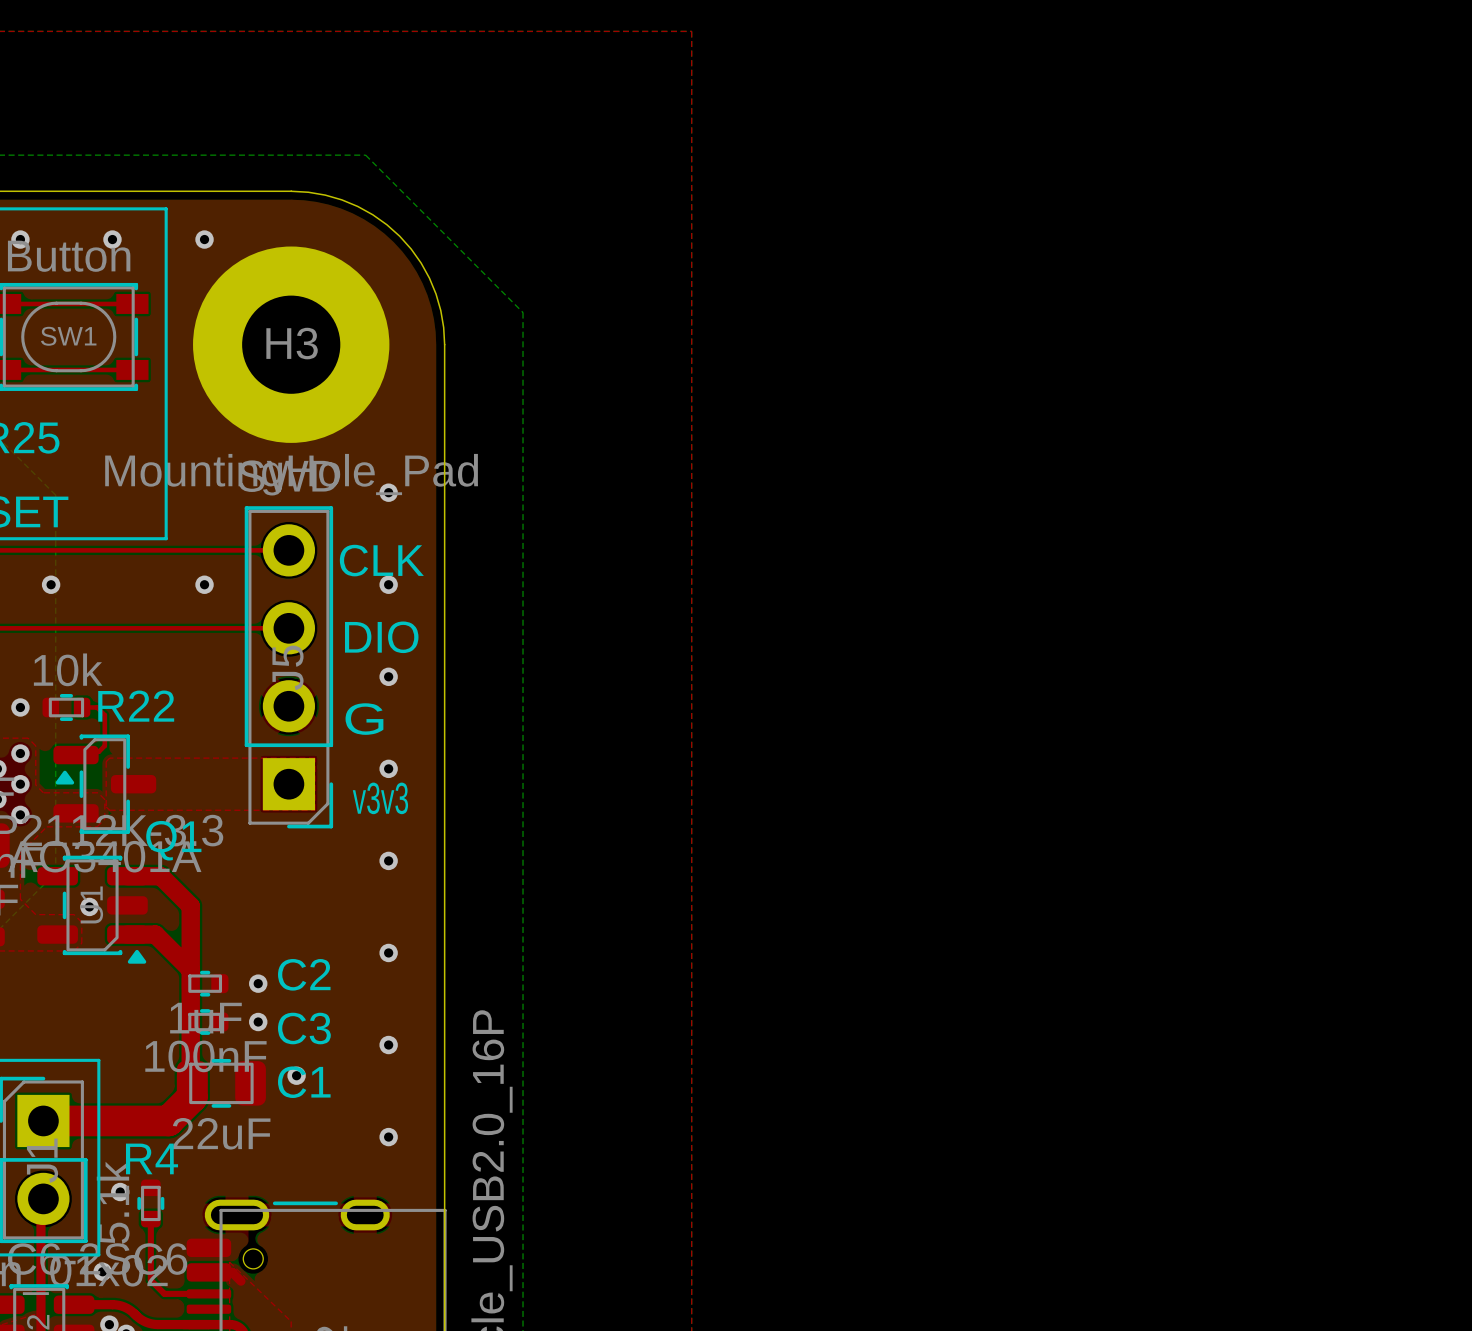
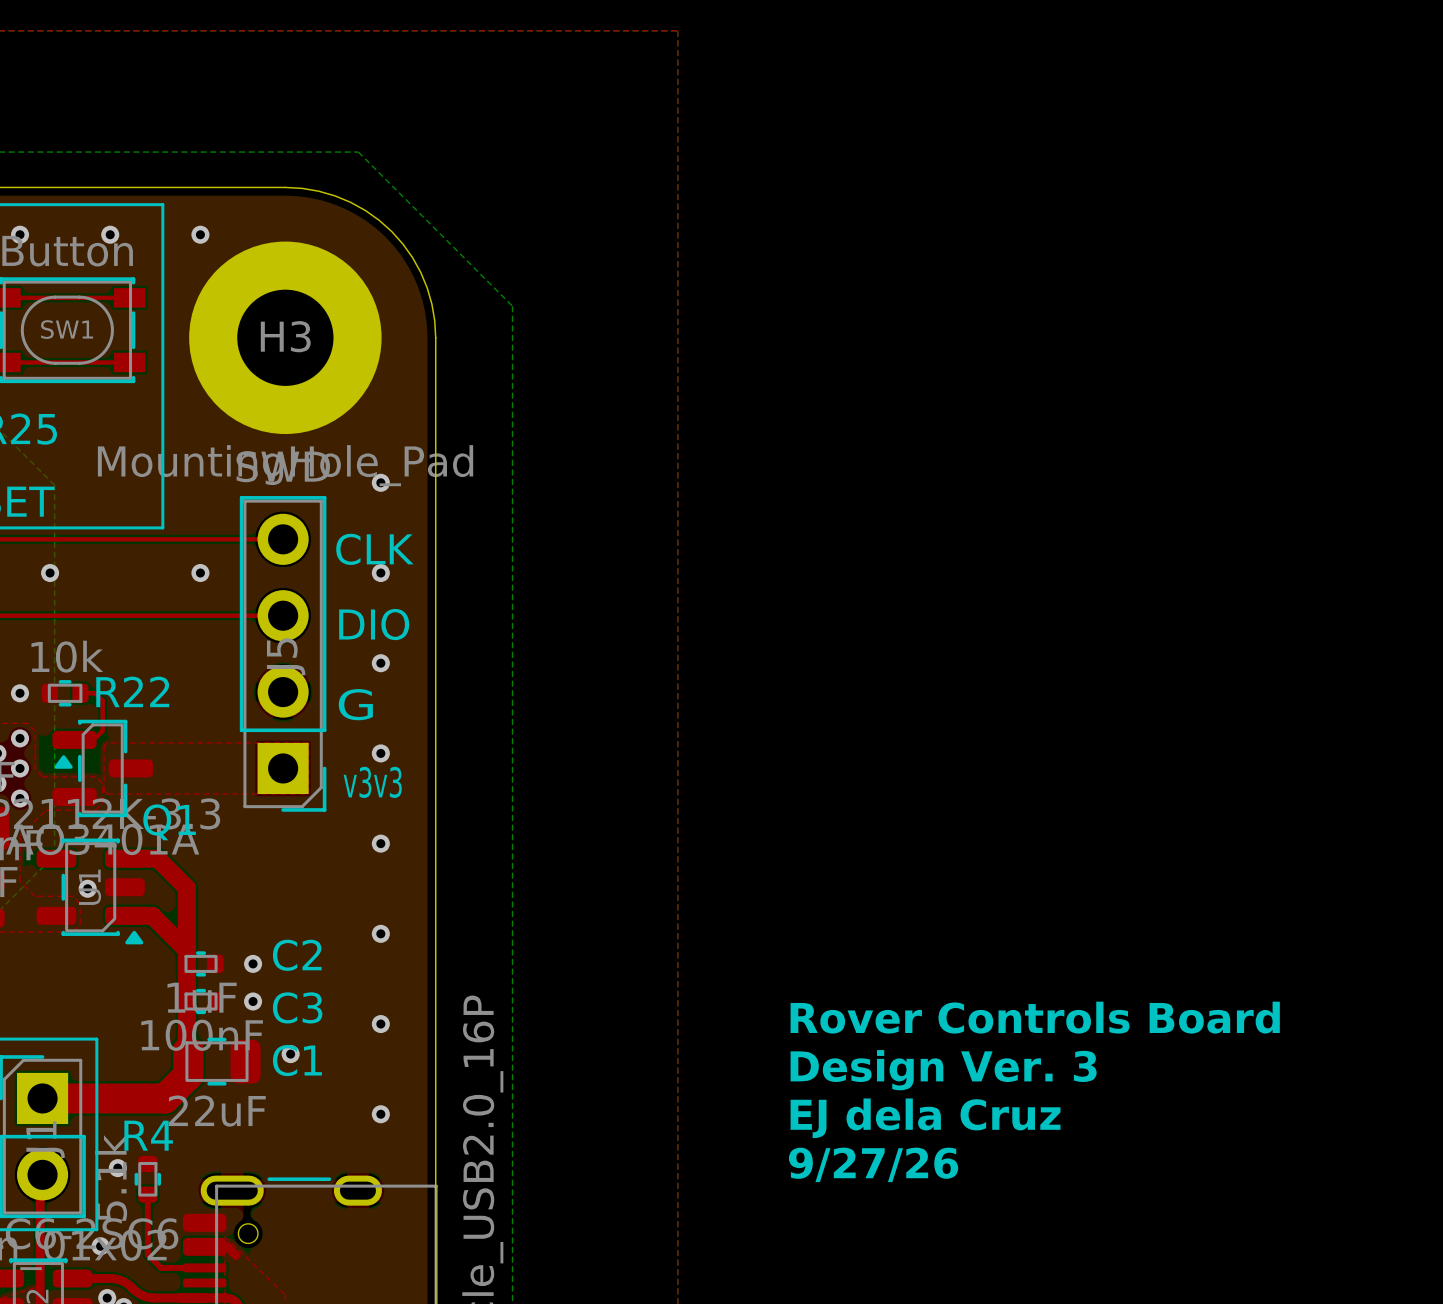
text: none -> Rover Controls Board (1035, 1017)
text: none -> Design Ver. 3 (943, 1070)
text: none -> EJ dela Cruz (925, 1118)
text: none -> 9/27/26 (873, 1164)

